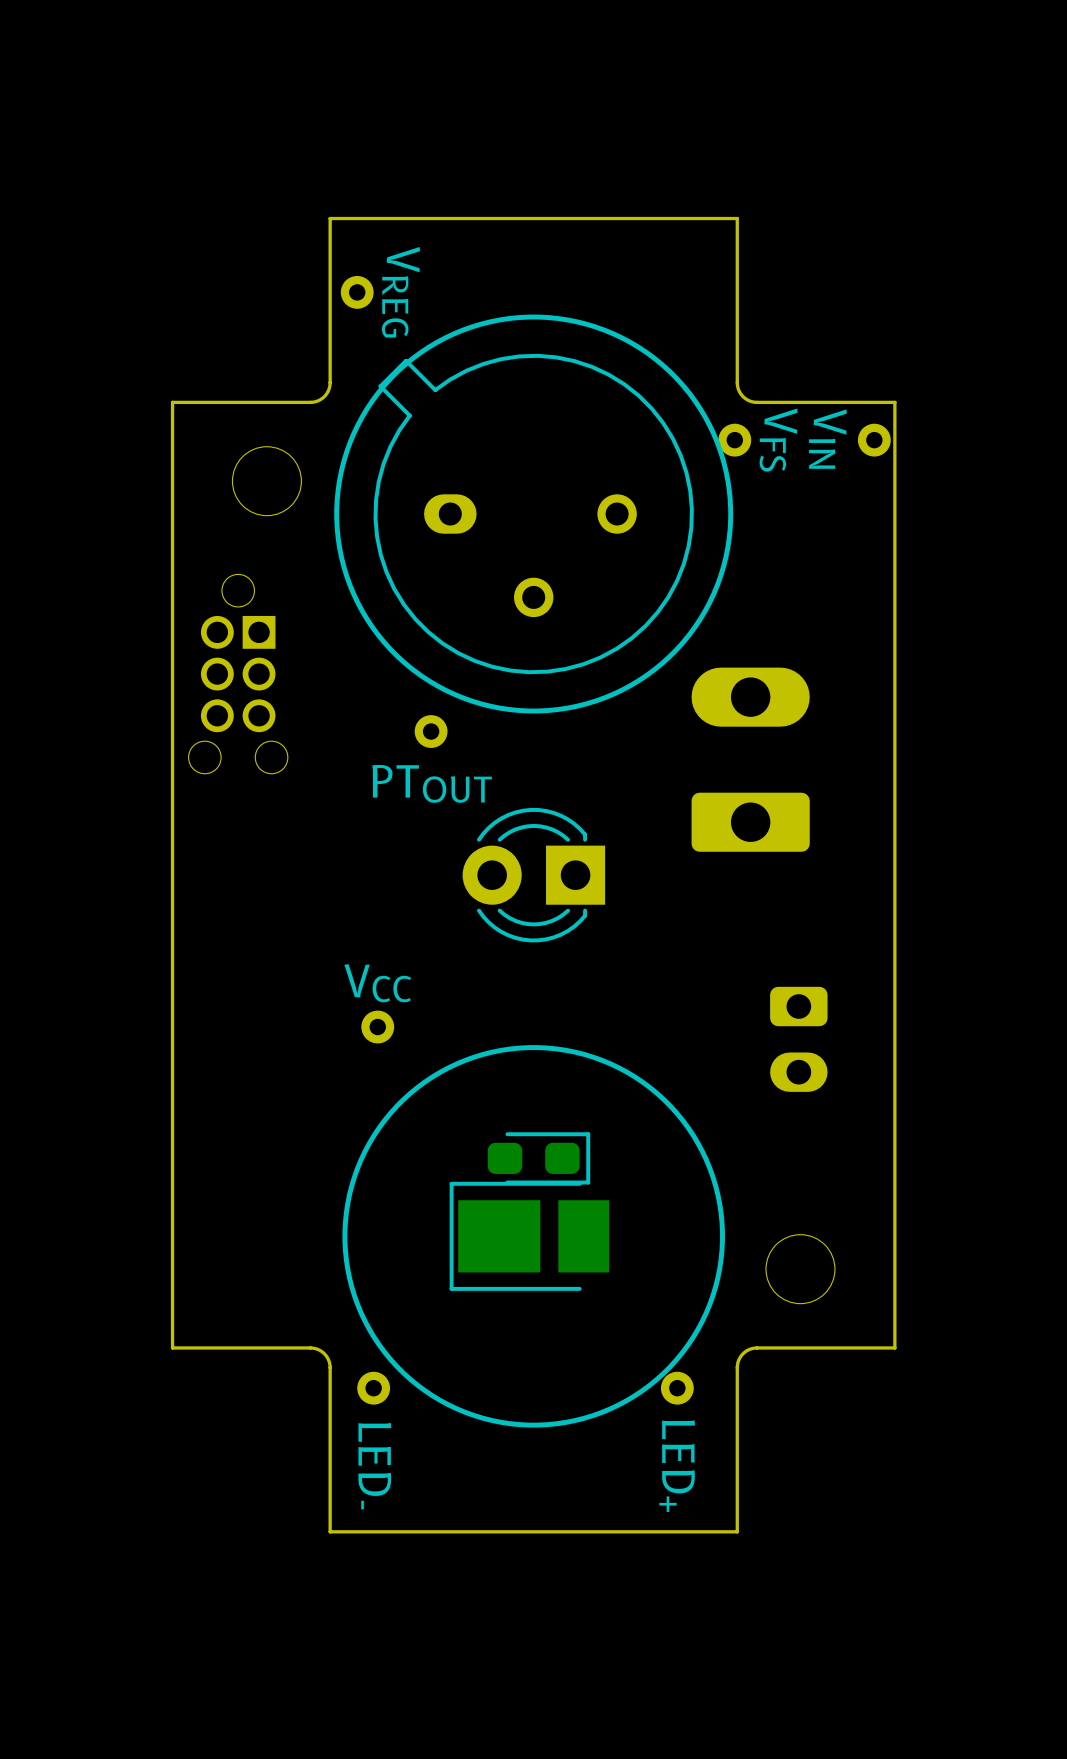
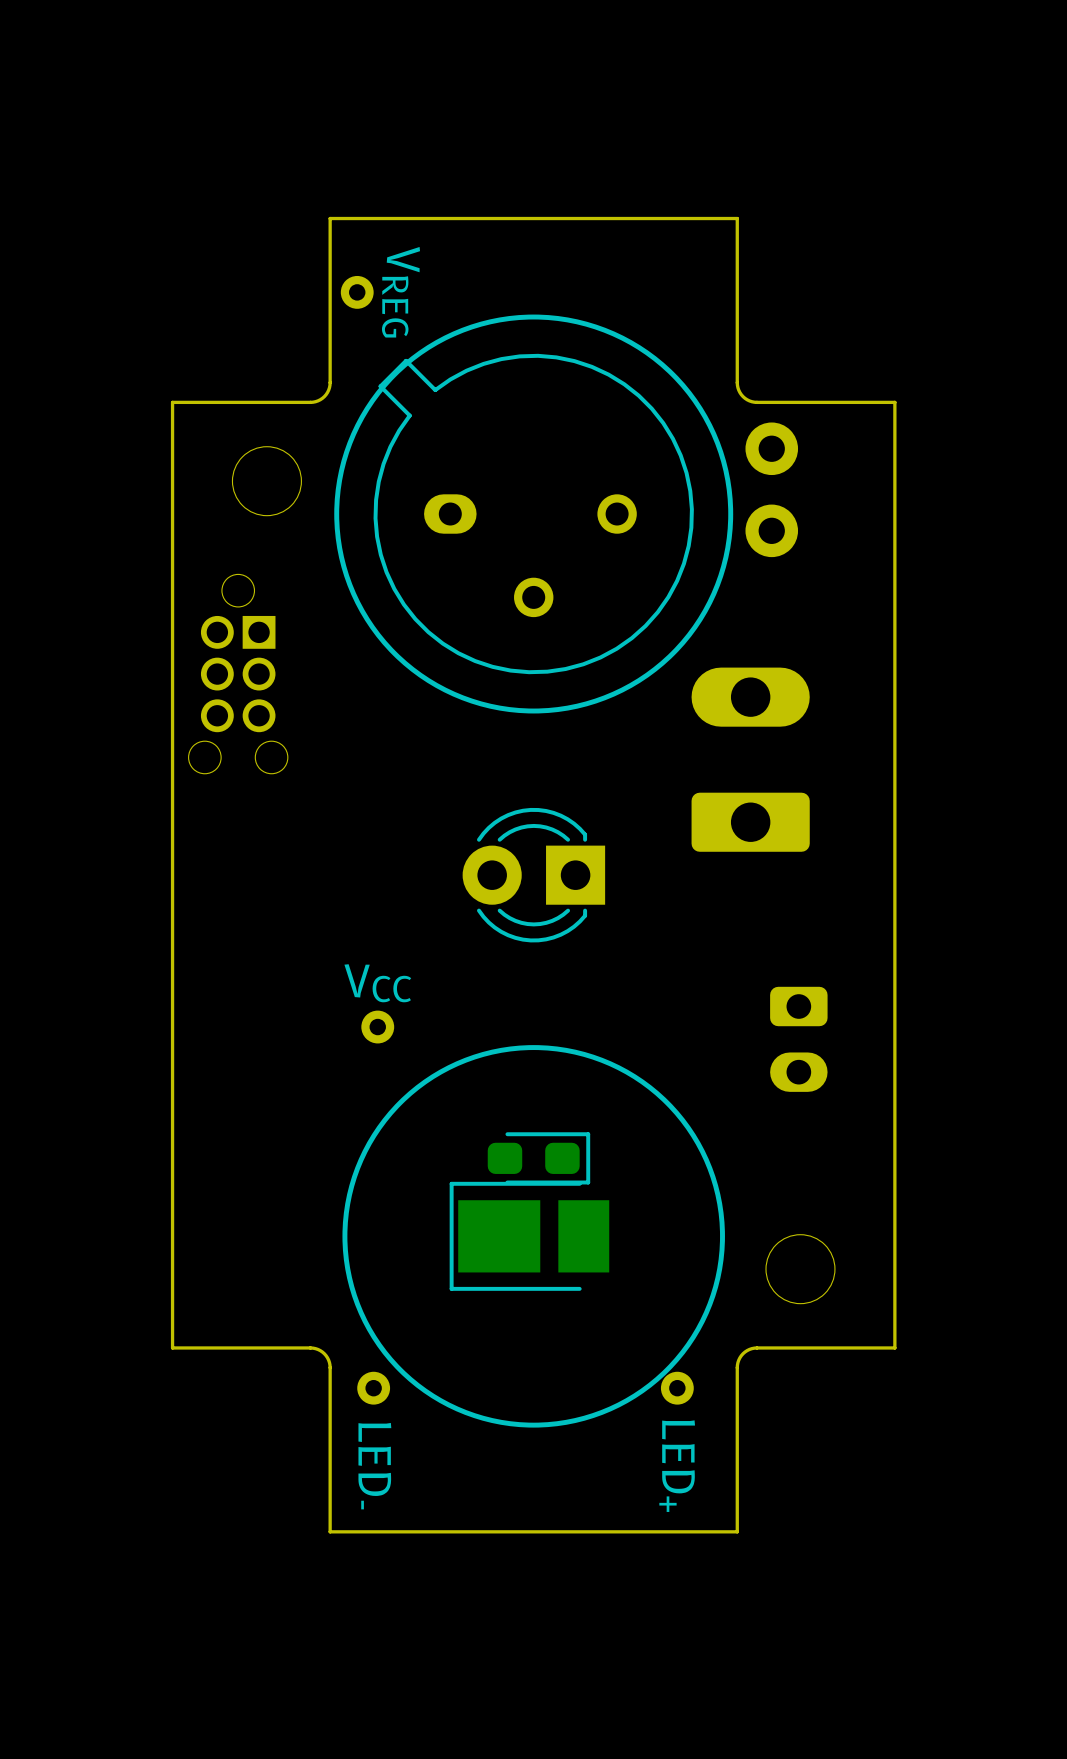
part: VFS (734, 440) -> none
part: VIN (874, 440) -> none
part: none -> (771, 489)
part: PTOUT (431, 731) -> none

